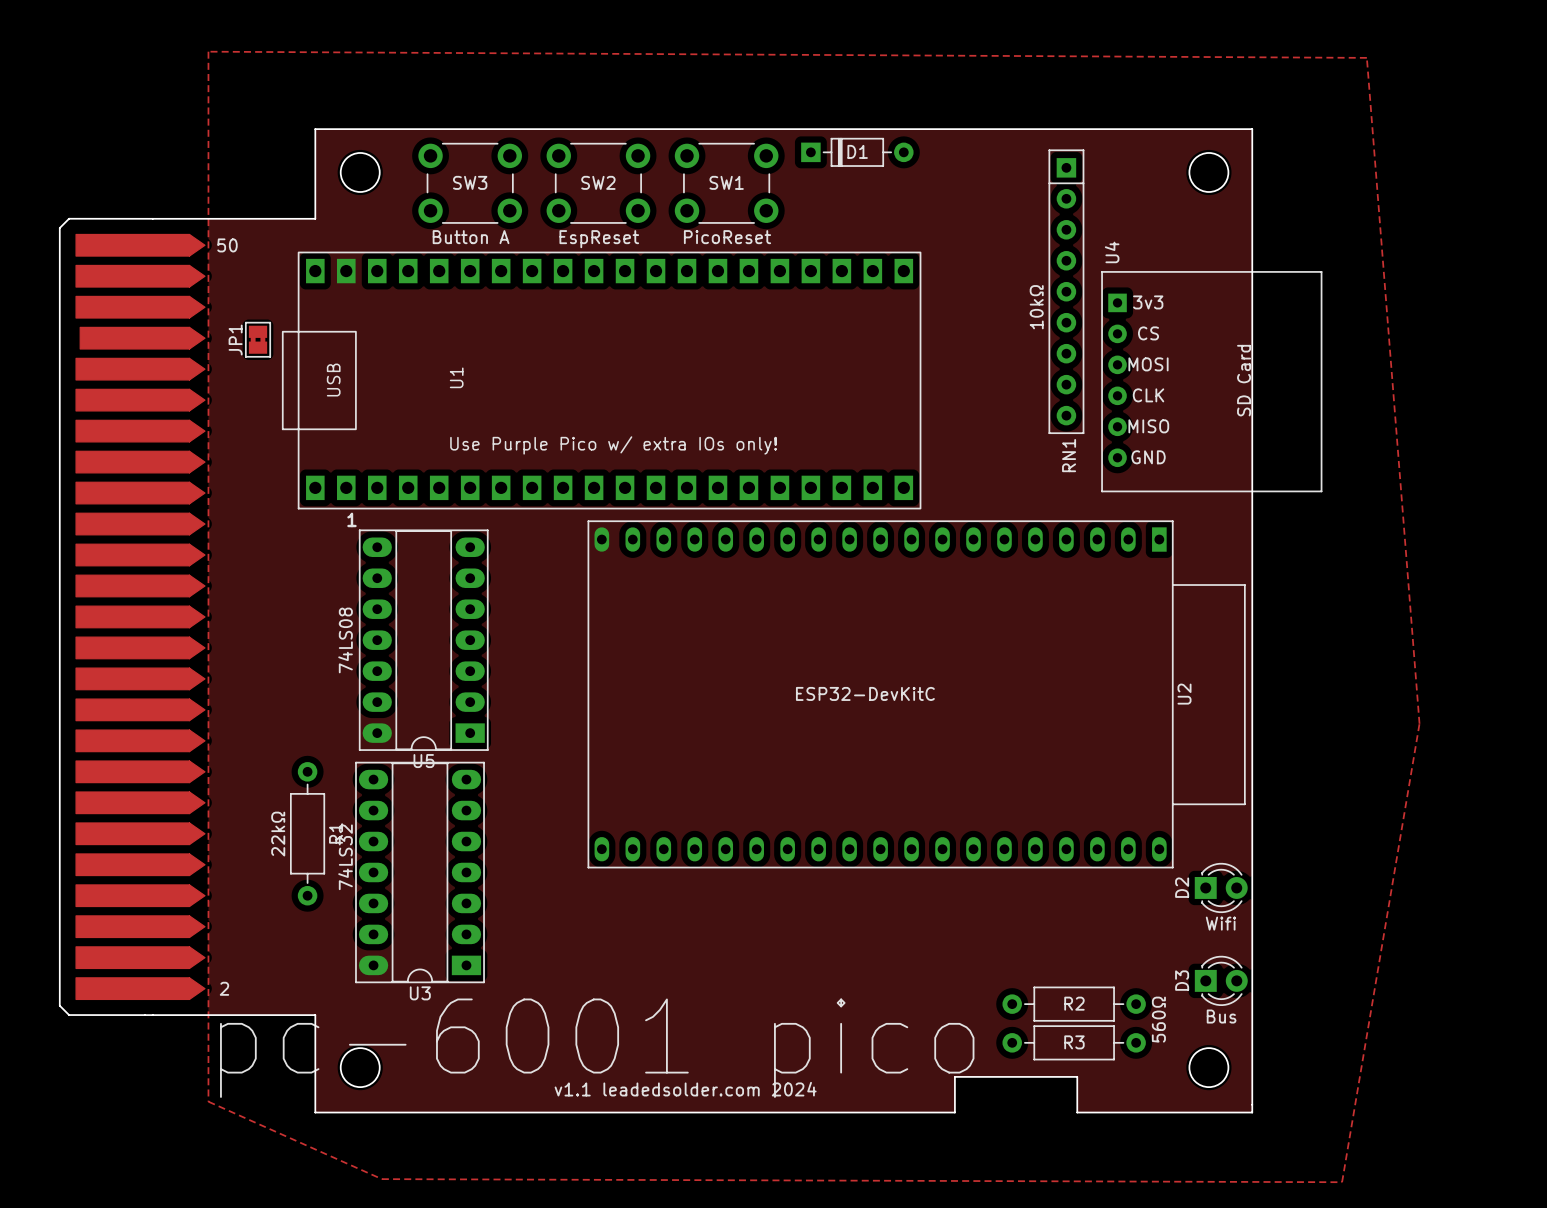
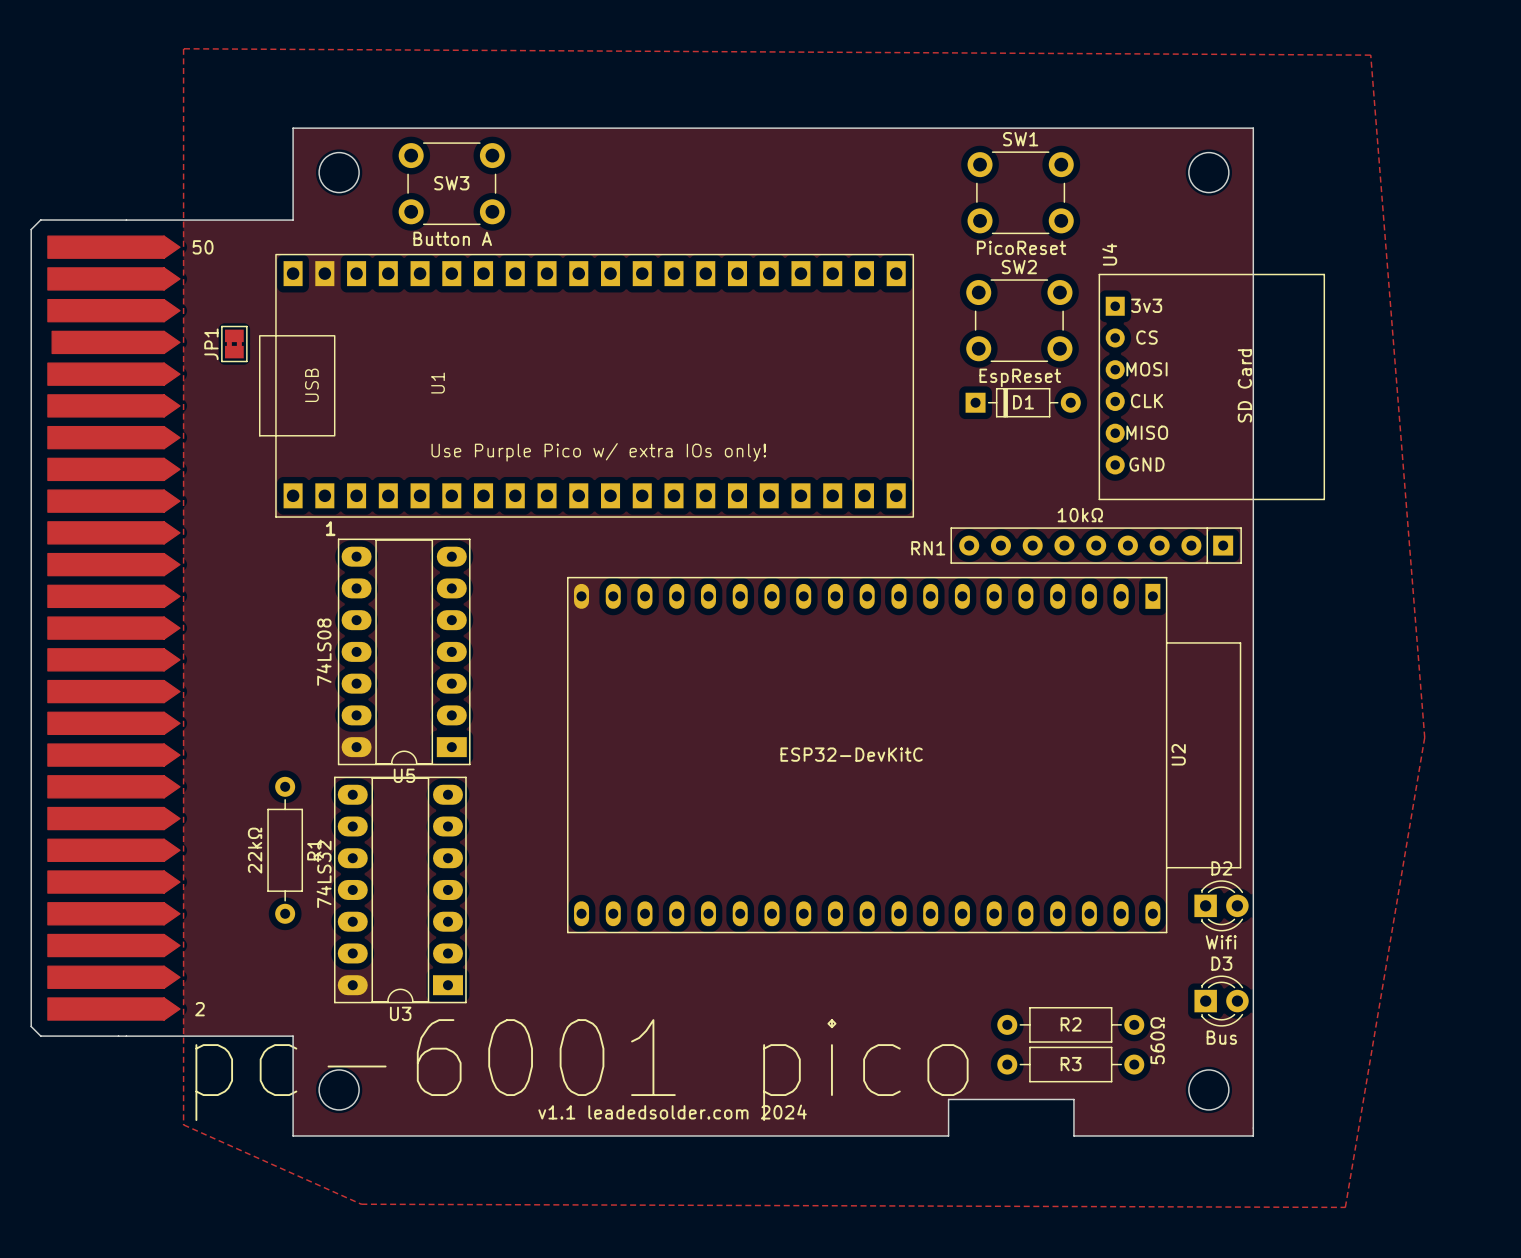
D1 position: (857, 152) -> (1023, 402)
SW2 name position: SW2 (598, 182) -> SW2 (1019, 267)
SW1 name position: SW1 (726, 182) -> SW1 (1020, 139)
SW2 position: (598, 183) -> (1019, 320)
SW1 position: (726, 183) -> (1020, 192)
RN1 rotation: 0° (1066, 291) -> 90° clockwise (1096, 545)
RN1 position: (1066, 291) -> (1096, 545)
U2 position: (916, 694) -> (904, 755)
D2 name rotation: 0° (1182, 887) -> 90° clockwise (1221, 868)
D2 name position: D2 (1182, 887) -> D2 (1221, 868)
D3 name rotation: 0° (1182, 980) -> 90° clockwise (1221, 963)
D3 name position: D3 (1182, 980) -> D3 (1221, 963)

